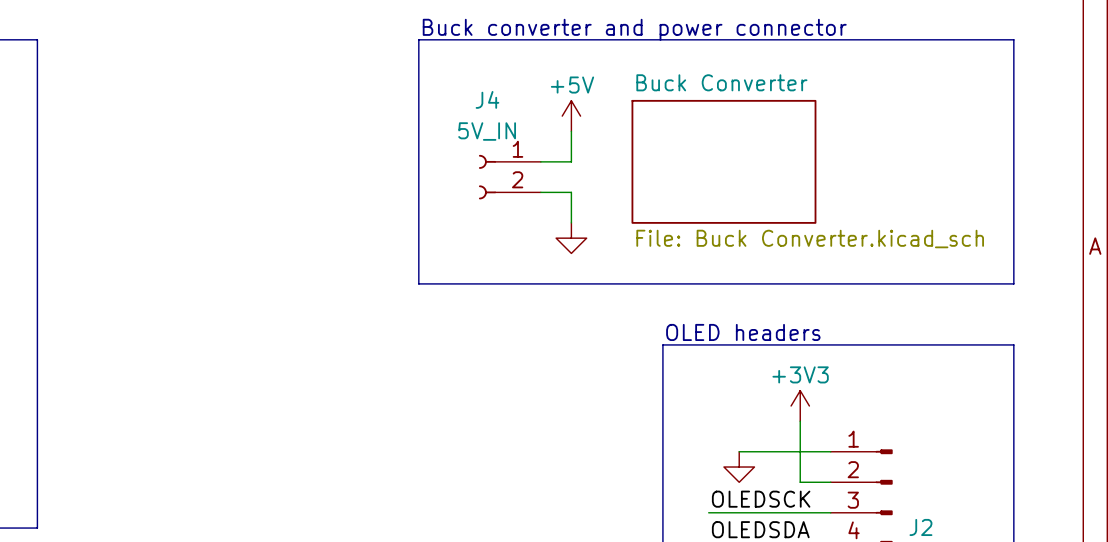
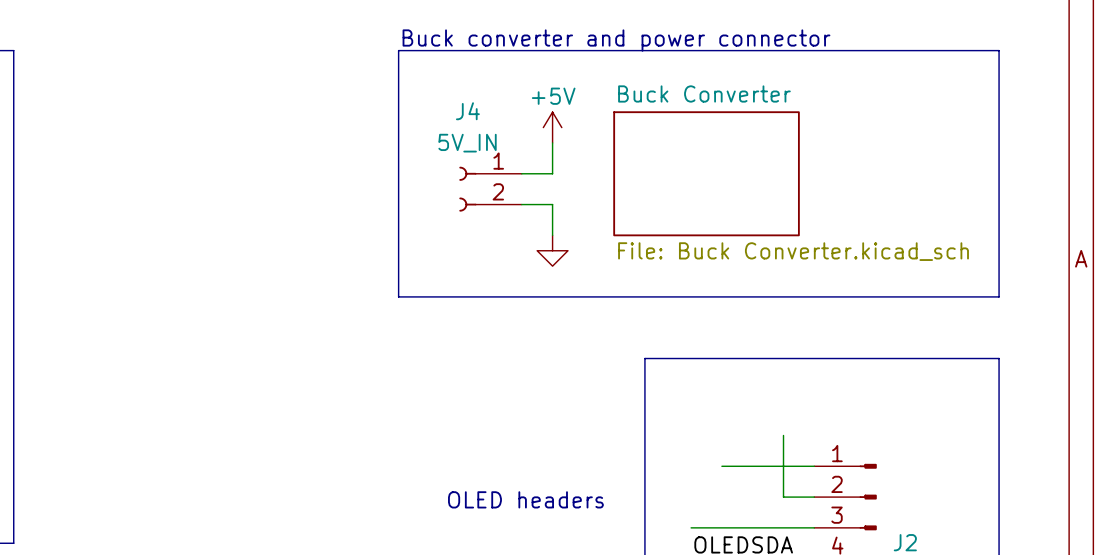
text position: OLED headers (743, 332) -> OLED headers (525, 499)
power symbol: +3V3 (800, 405) -> none
power symbol: (739, 467) -> none
label: OLEDSCK (761, 499) -> none

